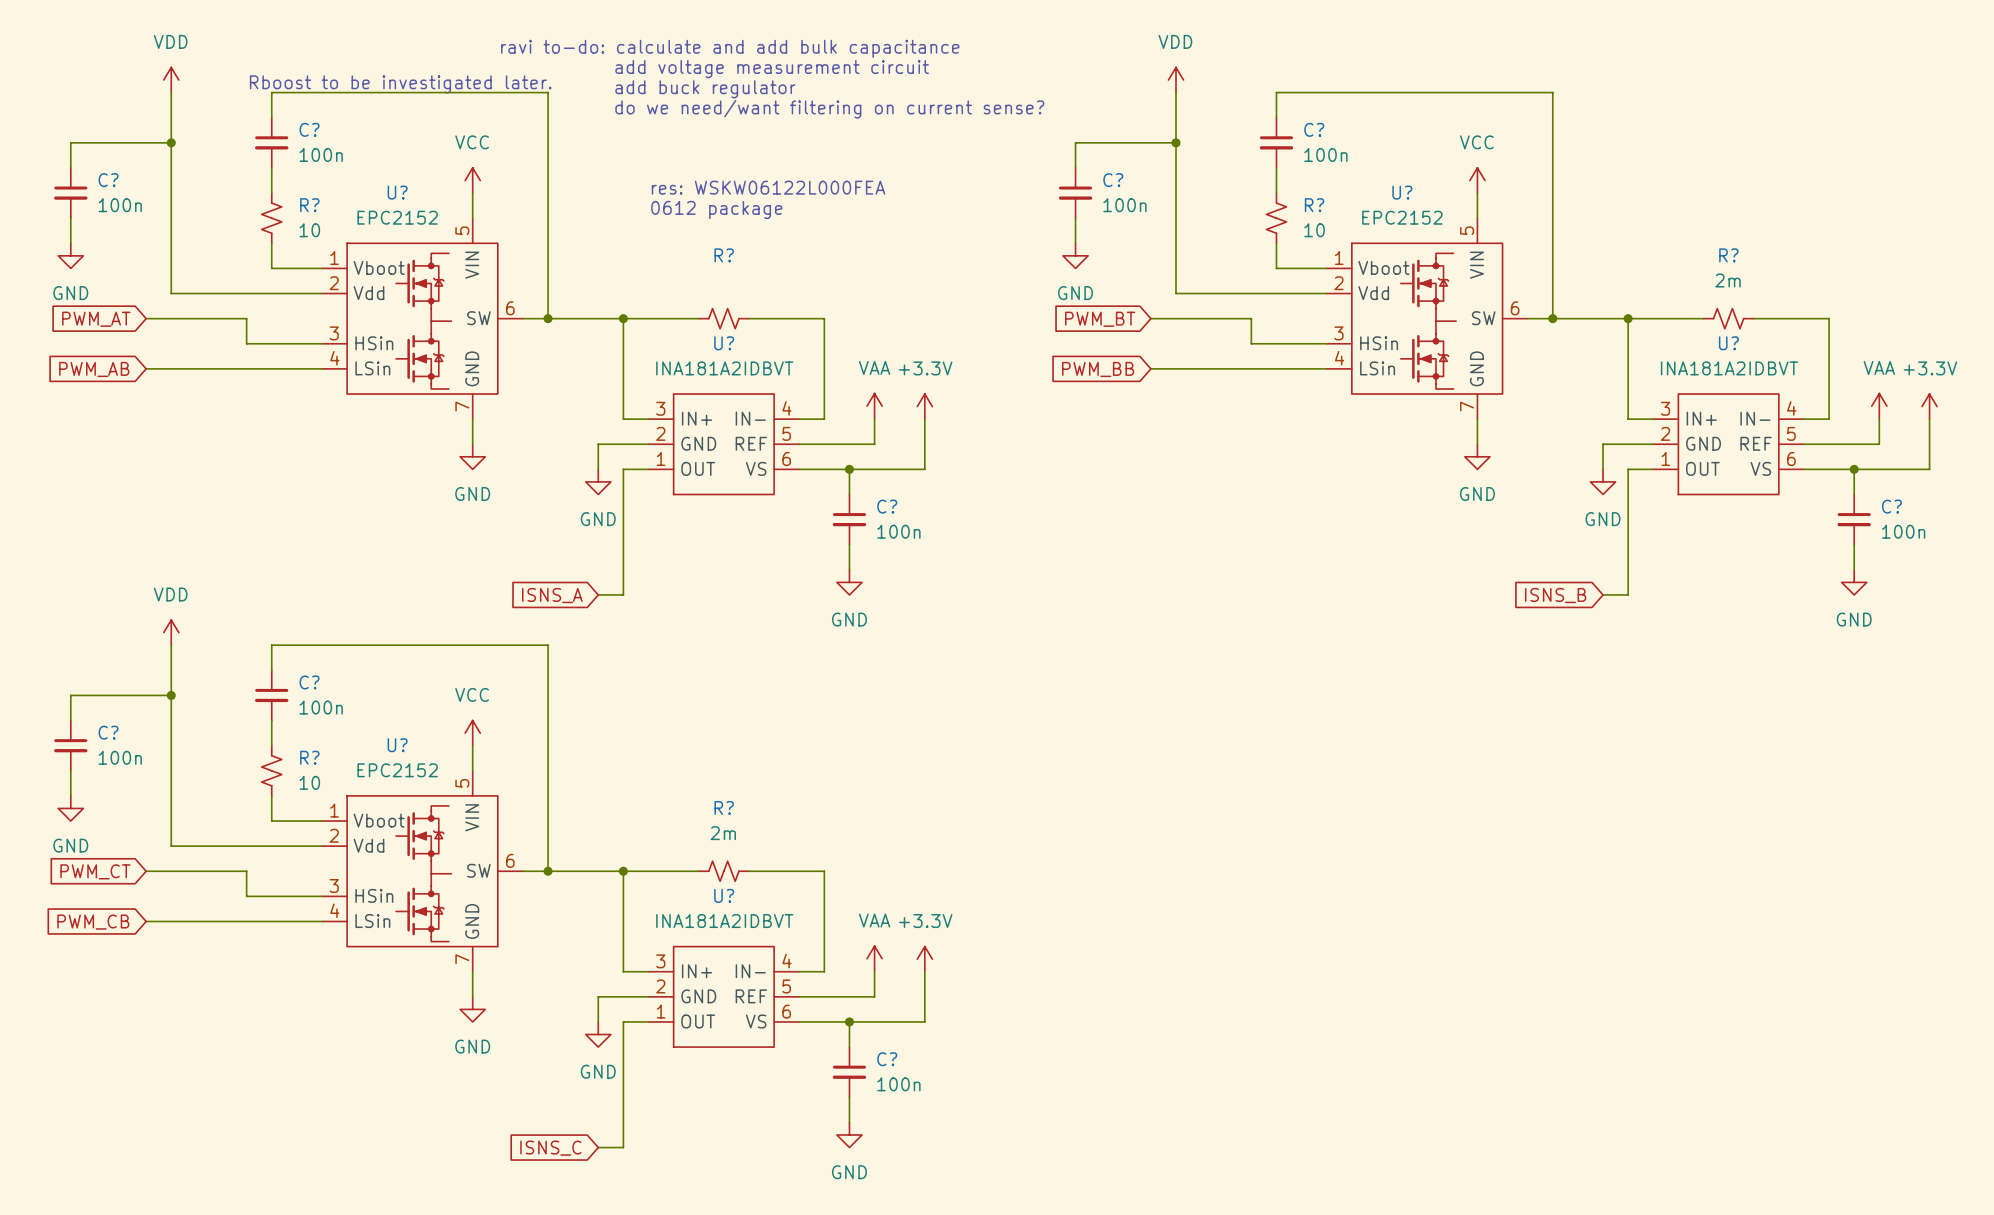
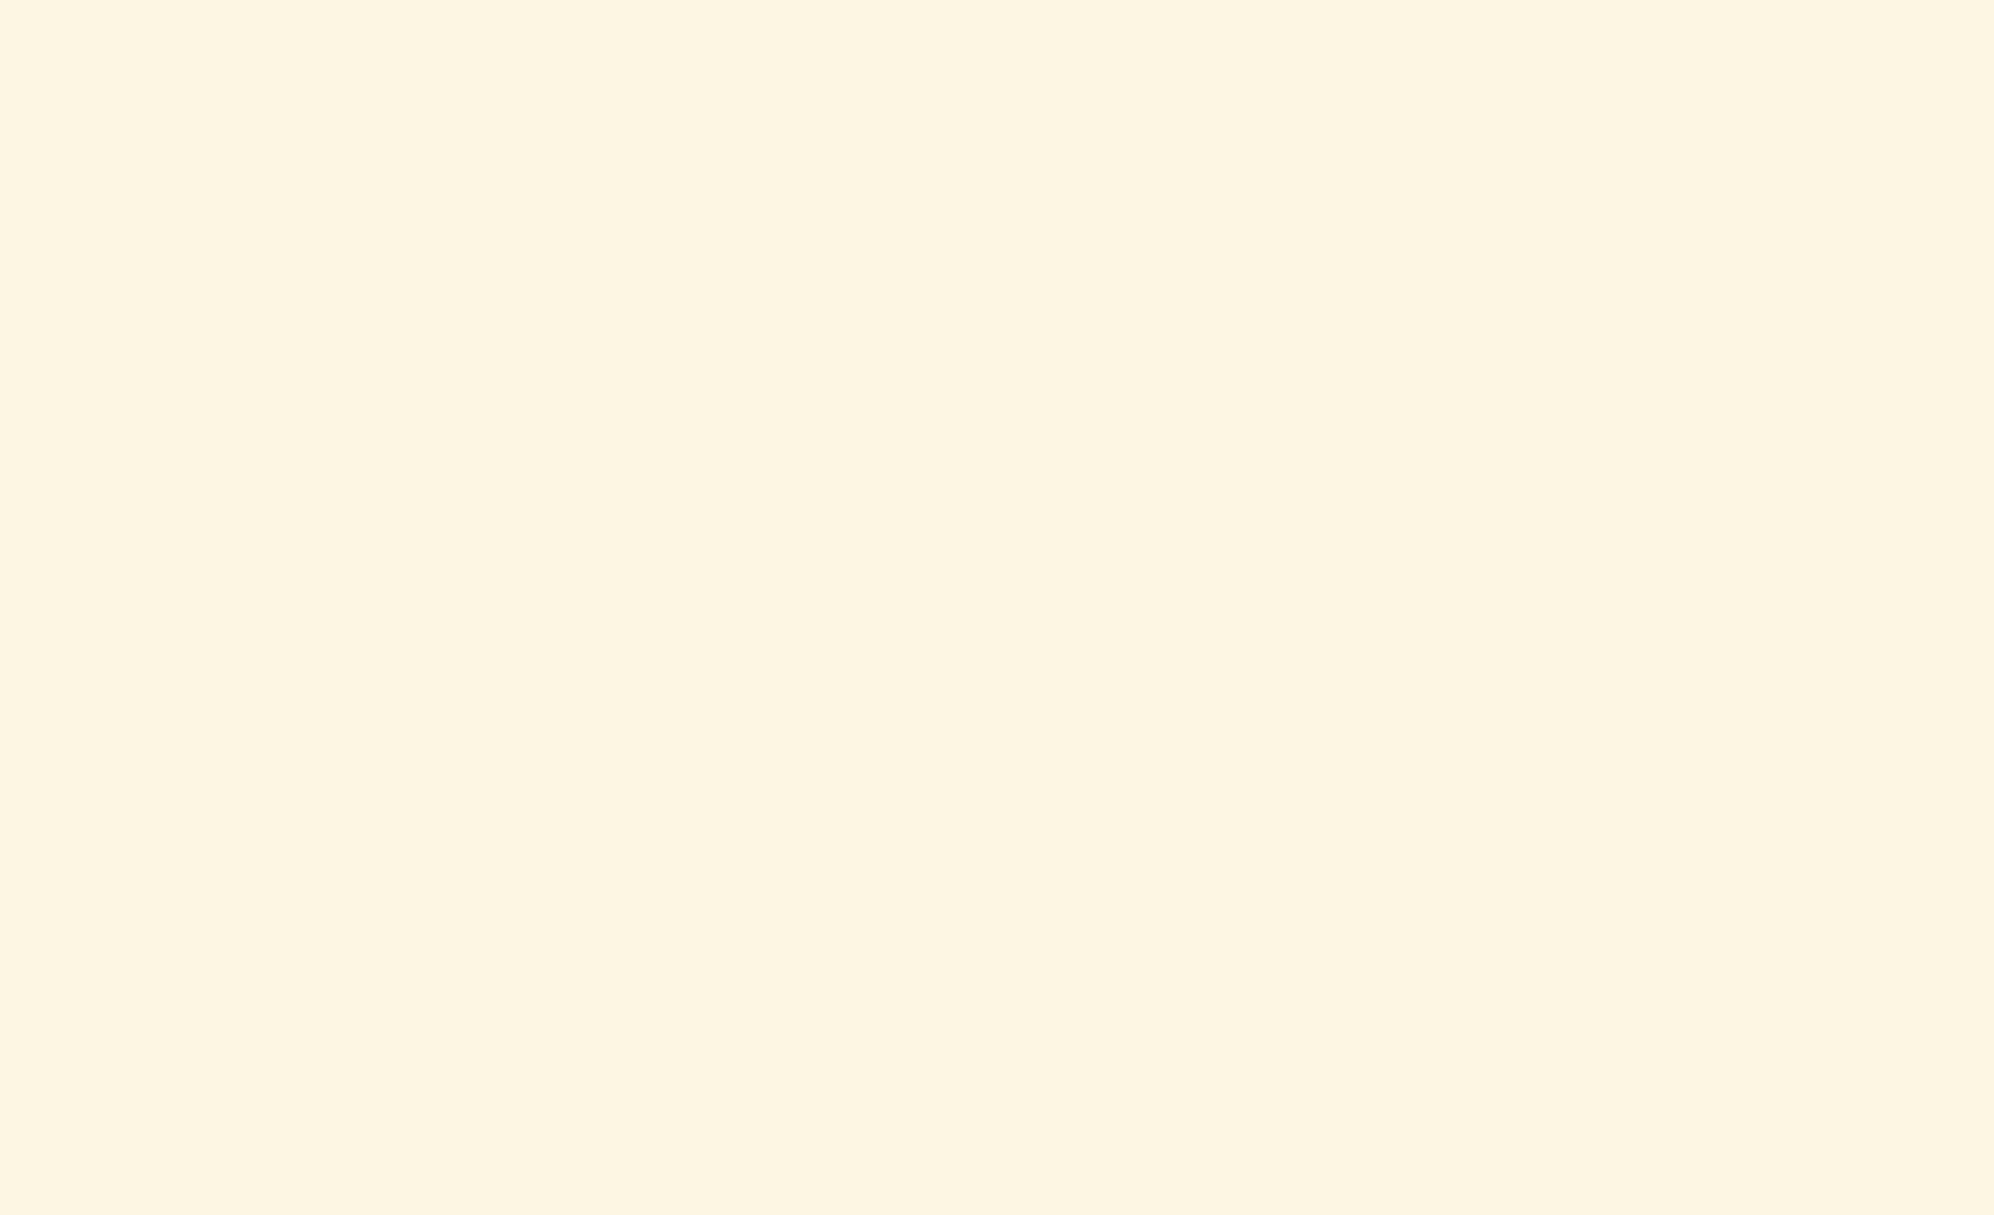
text: ravi to-do: calculate and add bulk capacitance (730, 48) -> none
text: add voltage measurement circuit (772, 69) -> none
power symbol: VDD (171, 80) -> none
power symbol: VDD (1176, 80) -> none
text: Rboost to be investigated later. (400, 84) -> none
text: add buck regulator (705, 89) -> none
wire: (171, 92) (171, 293) (321, 293) -> none
wire: (1176, 92) (1176, 293) (1326, 293) -> none
text: do we need/want filtering on current sense? (829, 109) -> none
wire: (271, 117) (271, 92) (548, 92) (548, 318) -> none
wire: (1276, 117) (1276, 92) (1552, 92) (1552, 318) -> none
wire: (171, 142) (70, 142) (70, 167) -> none
junction: (171, 142) -> none
C?: 100n (271, 142) -> none
wire: (1176, 142) (1075, 142) (1075, 167) -> none
junction: (1176, 142) -> none
C?: 100n (1276, 142) -> none
wire: (271, 167) (271, 193) -> none
wire: (1276, 167) (1276, 193) -> none
power symbol: VCC (472, 180) -> none
power symbol: VCC (1477, 180) -> none
text: res: WSKW06122L000FEA (768, 187) -> none
C?: 100n (70, 193) -> none
wire: (472, 193) (472, 218) -> none
C?: 100n (1075, 193) -> none
wire: (1477, 193) (1477, 218) -> none
text: 0612 package (716, 209) -> none
wire: (70, 218) (70, 243) -> none
R?: 10 (271, 218) -> none
wire: (1075, 218) (1075, 243) -> none
R?: 10 (1276, 218) -> none
wire: (271, 243) (271, 268) (321, 268) -> none
wire: (1276, 243) (1276, 268) (1326, 268) -> none
power symbol: GND (70, 255) -> none
power symbol: GND (1075, 255) -> none
wire: (146, 318) (246, 318) (246, 343) (321, 343) -> none
U?: EPC2152 (422, 318) -> none
wire: (522, 318) (698, 318) -> none
junction: (548, 318) -> none
wire: (623, 318) (623, 419) (648, 419) -> none
junction: (623, 318) -> none
R?: (723, 318) -> none
wire: (748, 318) (824, 318) (824, 419) (799, 419) -> none
wire: (1150, 318) (1251, 318) (1251, 343) (1326, 343) -> none
U?: EPC2152 (1427, 318) -> none
wire: (1527, 318) (1703, 318) -> none
junction: (1552, 318) -> none
wire: (1628, 318) (1628, 419) (1653, 419) -> none
junction: (1628, 318) -> none
R?: 2m (1728, 318) -> none
wire: (1753, 318) (1829, 318) (1829, 419) (1803, 419) -> none
global label: PWM_AT (96, 319) -> none
global label: PWM_BT (1100, 319) -> none
wire: (146, 368) (321, 368) -> none
wire: (1150, 368) (1326, 368) -> none
global label: PWM_AB (94, 369) -> none
global label: PWM_BB (1098, 369) -> none
power symbol: VAA (874, 406) -> none
power symbol: +3.3V (924, 406) -> none
power symbol: VAA (1879, 406) -> none
power symbol: +3.3V (1929, 406) -> none
wire: (472, 419) (472, 444) -> none
wire: (874, 419) (874, 444) (799, 444) -> none
wire: (924, 419) (924, 469) (799, 469) -> none
wire: (1477, 419) (1477, 444) -> none
wire: (1879, 419) (1879, 444) (1803, 444) -> none
wire: (1929, 419) (1929, 469) (1803, 469) -> none
wire: (648, 444) (598, 444) (598, 469) -> none
U?: INA181A2IDBVT (723, 444) -> none
wire: (1653, 444) (1603, 444) (1603, 469) -> none
U?: INA181A2IDBVT (1728, 444) -> none
power symbol: GND (472, 456) -> none
power symbol: GND (1477, 456) -> none
wire: (648, 469) (623, 469) (623, 594) (598, 594) -> none
wire: (849, 469) (849, 494) -> none
junction: (849, 469) -> none
wire: (1653, 469) (1628, 469) (1628, 594) (1603, 594) -> none
wire: (1854, 469) (1854, 494) -> none
junction: (1854, 469) -> none
power symbol: GND (598, 481) -> none
power symbol: GND (1603, 481) -> none
C?: 100n (849, 519) -> none
C?: 100n (1854, 519) -> none
wire: (849, 544) (849, 569) -> none
wire: (1854, 544) (1854, 569) -> none
power symbol: GND (849, 582) -> none
power symbol: GND (1854, 582) -> none
global label: ISNS_A (552, 595) -> none
global label: ISNS_B (1555, 595) -> none
power symbol: VDD (171, 632) -> none
wire: (171, 645) (171, 846) (321, 846) -> none
wire: (271, 670) (271, 645) (548, 645) (548, 871) -> none
wire: (171, 695) (70, 695) (70, 720) -> none
junction: (171, 695) -> none
C?: 100n (271, 695) -> none
wire: (271, 720) (271, 745) -> none
power symbol: VCC (472, 733) -> none
C?: 100n (70, 745) -> none
wire: (472, 745) (472, 770) -> none
wire: (70, 770) (70, 795) -> none
R?: 10 (271, 770) -> none
wire: (271, 795) (271, 821) (321, 821) -> none
power symbol: GND (70, 808) -> none
global label: PWM_CT (95, 871) -> none
wire: (146, 871) (246, 871) (246, 896) (321, 896) -> none
U?: EPC2152 (422, 871) -> none
wire: (522, 871) (698, 871) -> none
junction: (548, 871) -> none
wire: (623, 871) (623, 971) (648, 971) -> none
junction: (623, 871) -> none
R?: 2m (723, 871) -> none
wire: (748, 871) (824, 871) (824, 971) (799, 971) -> none
wire: (146, 921) (321, 921) -> none
global label: PWM_CB (93, 922) -> none
power symbol: VAA (874, 958) -> none
power symbol: +3.3V (924, 959) -> none
wire: (472, 971) (472, 996) -> none
wire: (874, 971) (874, 996) (799, 996) -> none
wire: (924, 971) (924, 1021) (799, 1021) -> none
wire: (648, 996) (598, 996) (598, 1021) -> none
U?: INA181A2IDBVT (723, 996) -> none
power symbol: GND (472, 1009) -> none
wire: (648, 1021) (623, 1021) (623, 1147) (598, 1147) -> none
wire: (849, 1021) (849, 1047) -> none
junction: (849, 1021) -> none
power symbol: GND (598, 1034) -> none
C?: 100n (849, 1072) -> none
wire: (849, 1097) (849, 1122) -> none
power symbol: GND (849, 1135) -> none
global label: ISNS_C (550, 1148) -> none

